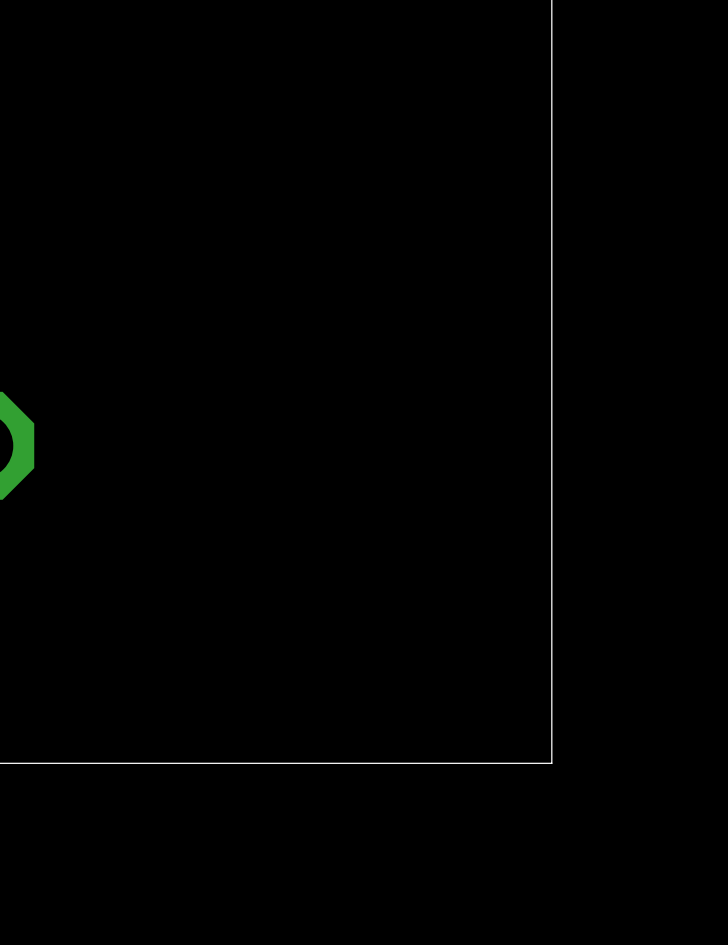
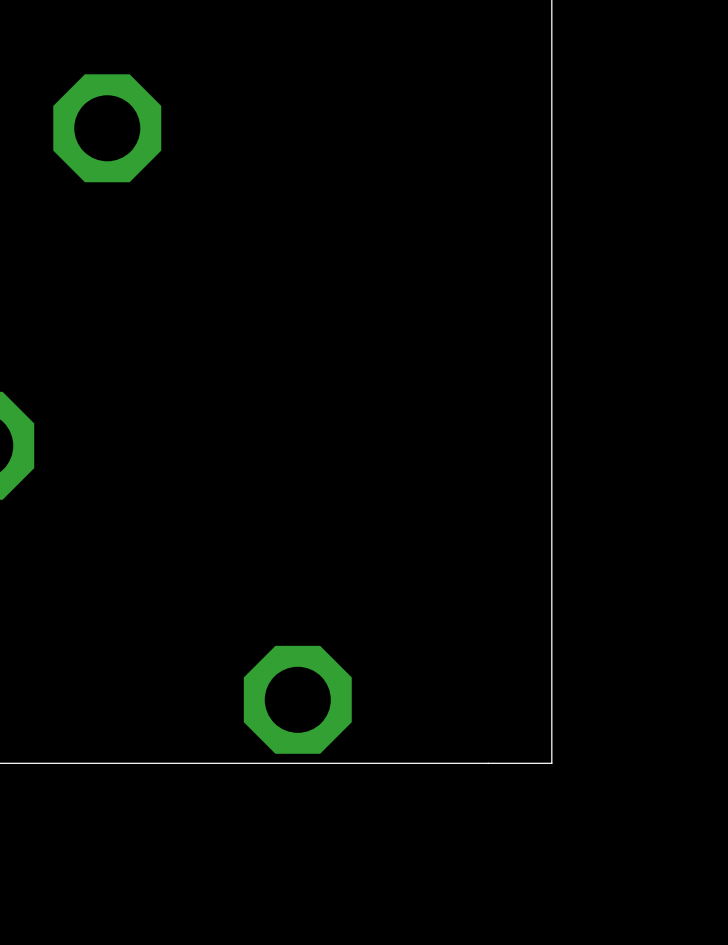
part: none -> (107, 128)
part: none -> (297, 699)

